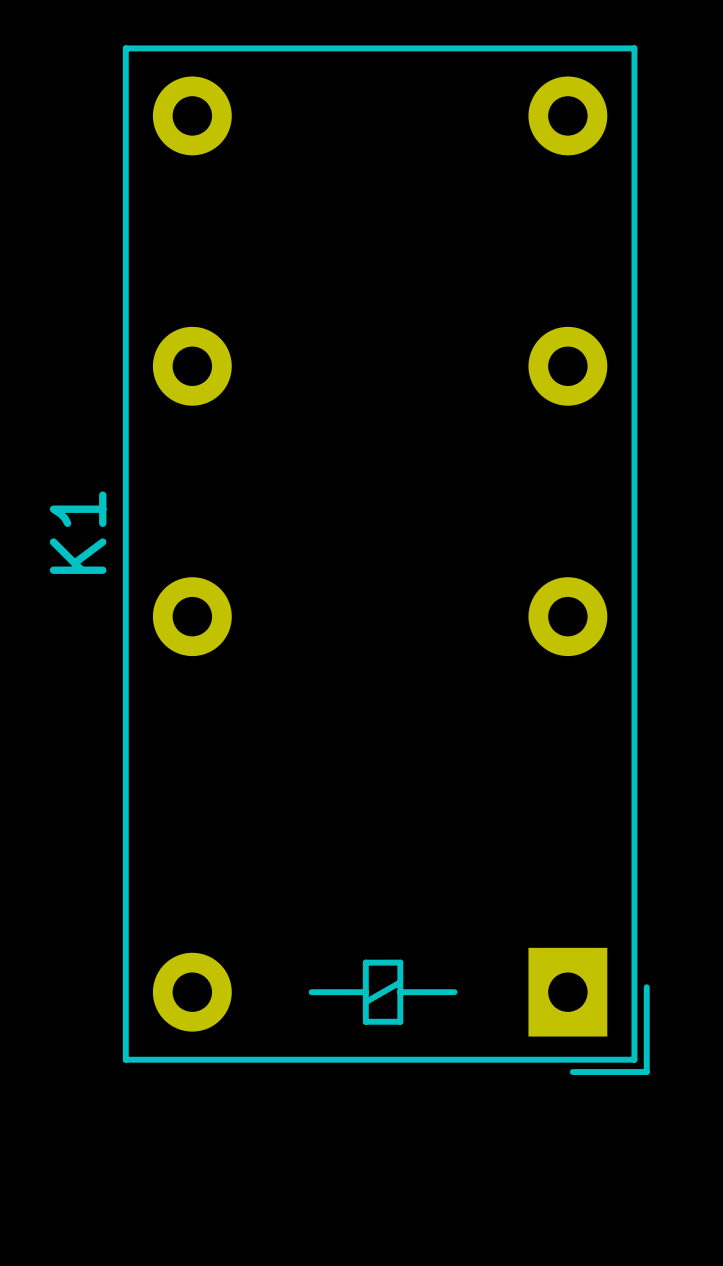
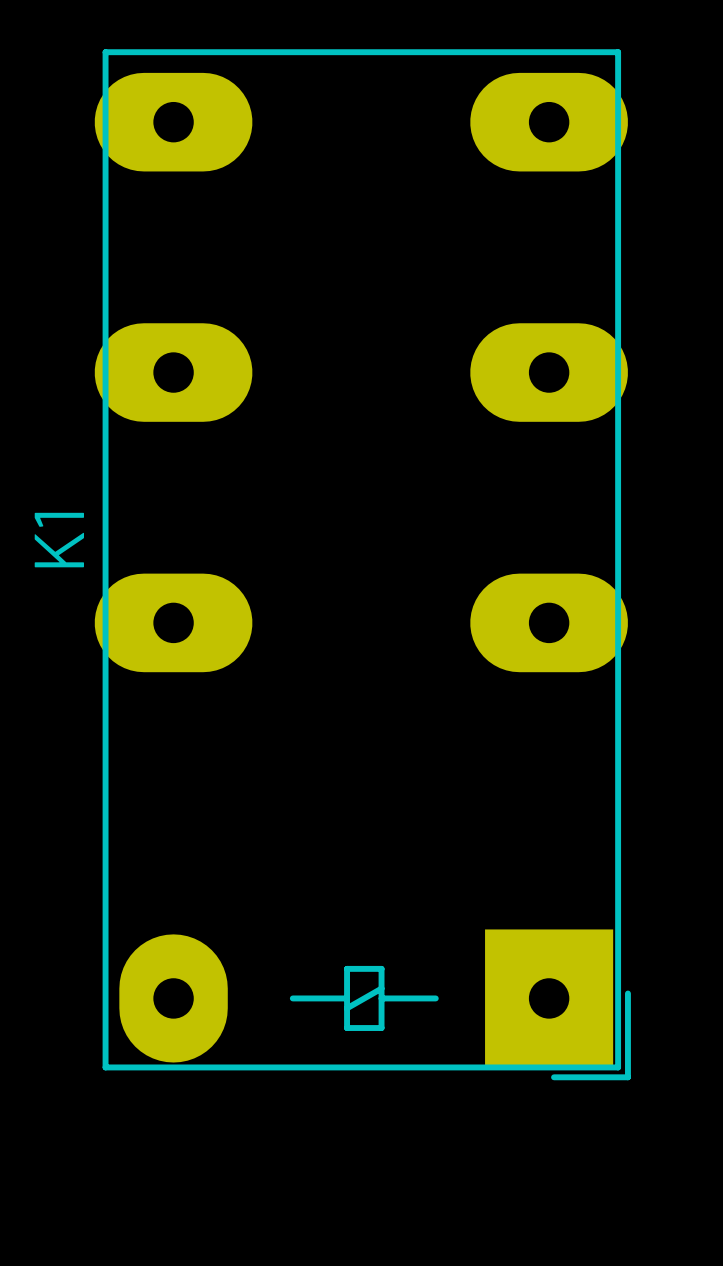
K1 footprint: [122, 45, 650, 1075] -> [94, 49, 631, 1081]

